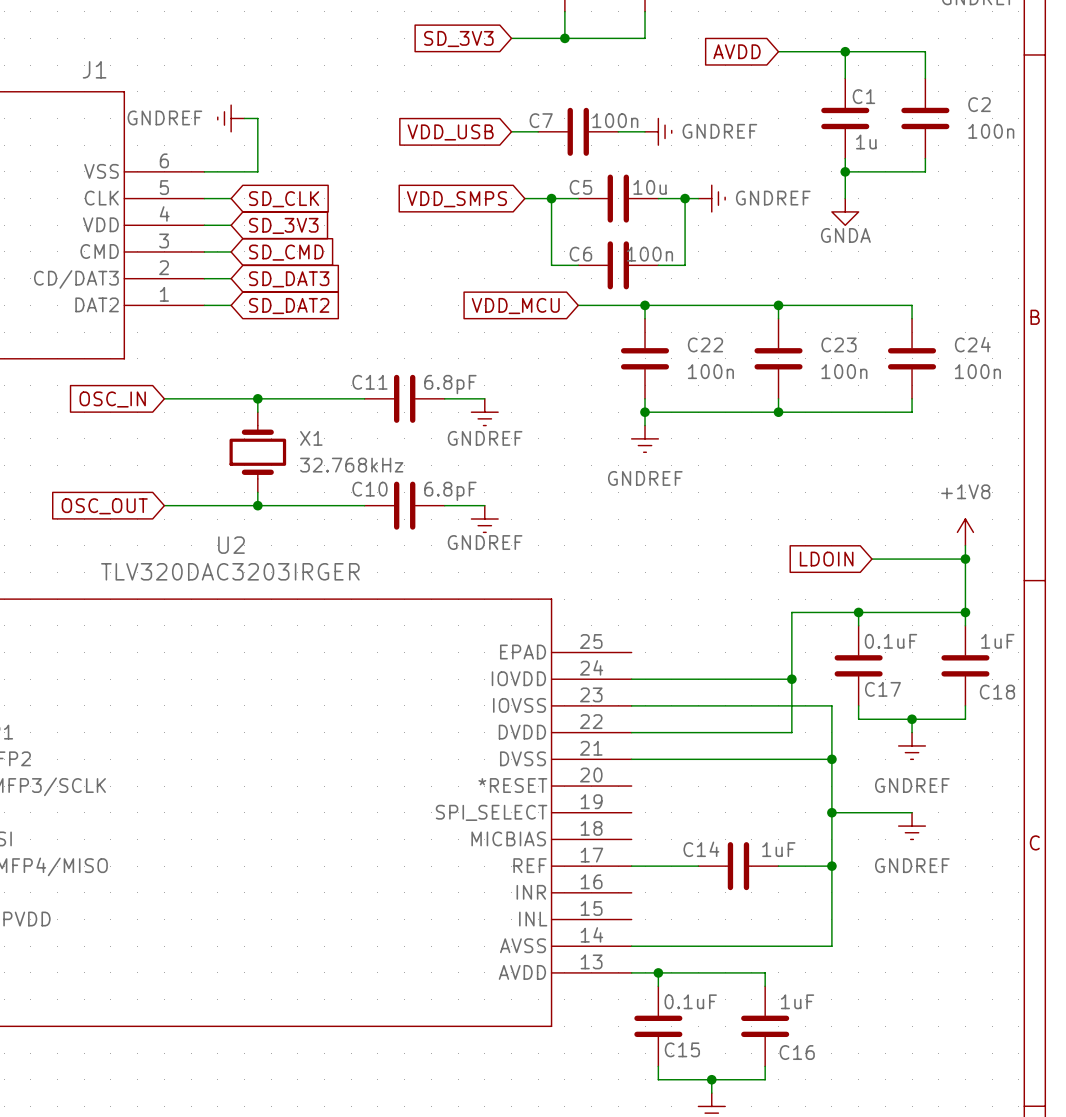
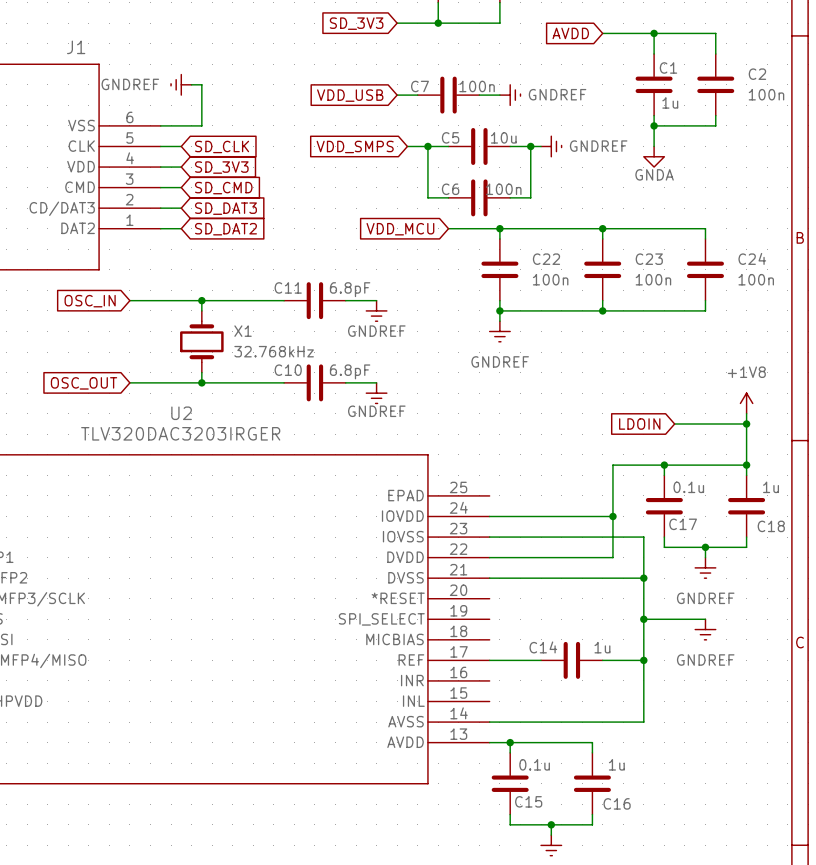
C17 value: 0.1uF (890, 641) -> 0.1u (688, 487)
C18 value: 1uF (997, 641) -> 1u (771, 487)
C14 value: 1uF (778, 849) -> 1u (602, 647)
C15 value: 0.1uF (690, 1001) -> 0.1u (534, 764)
C16 value: 1uF (797, 1001) -> 1u (616, 764)

